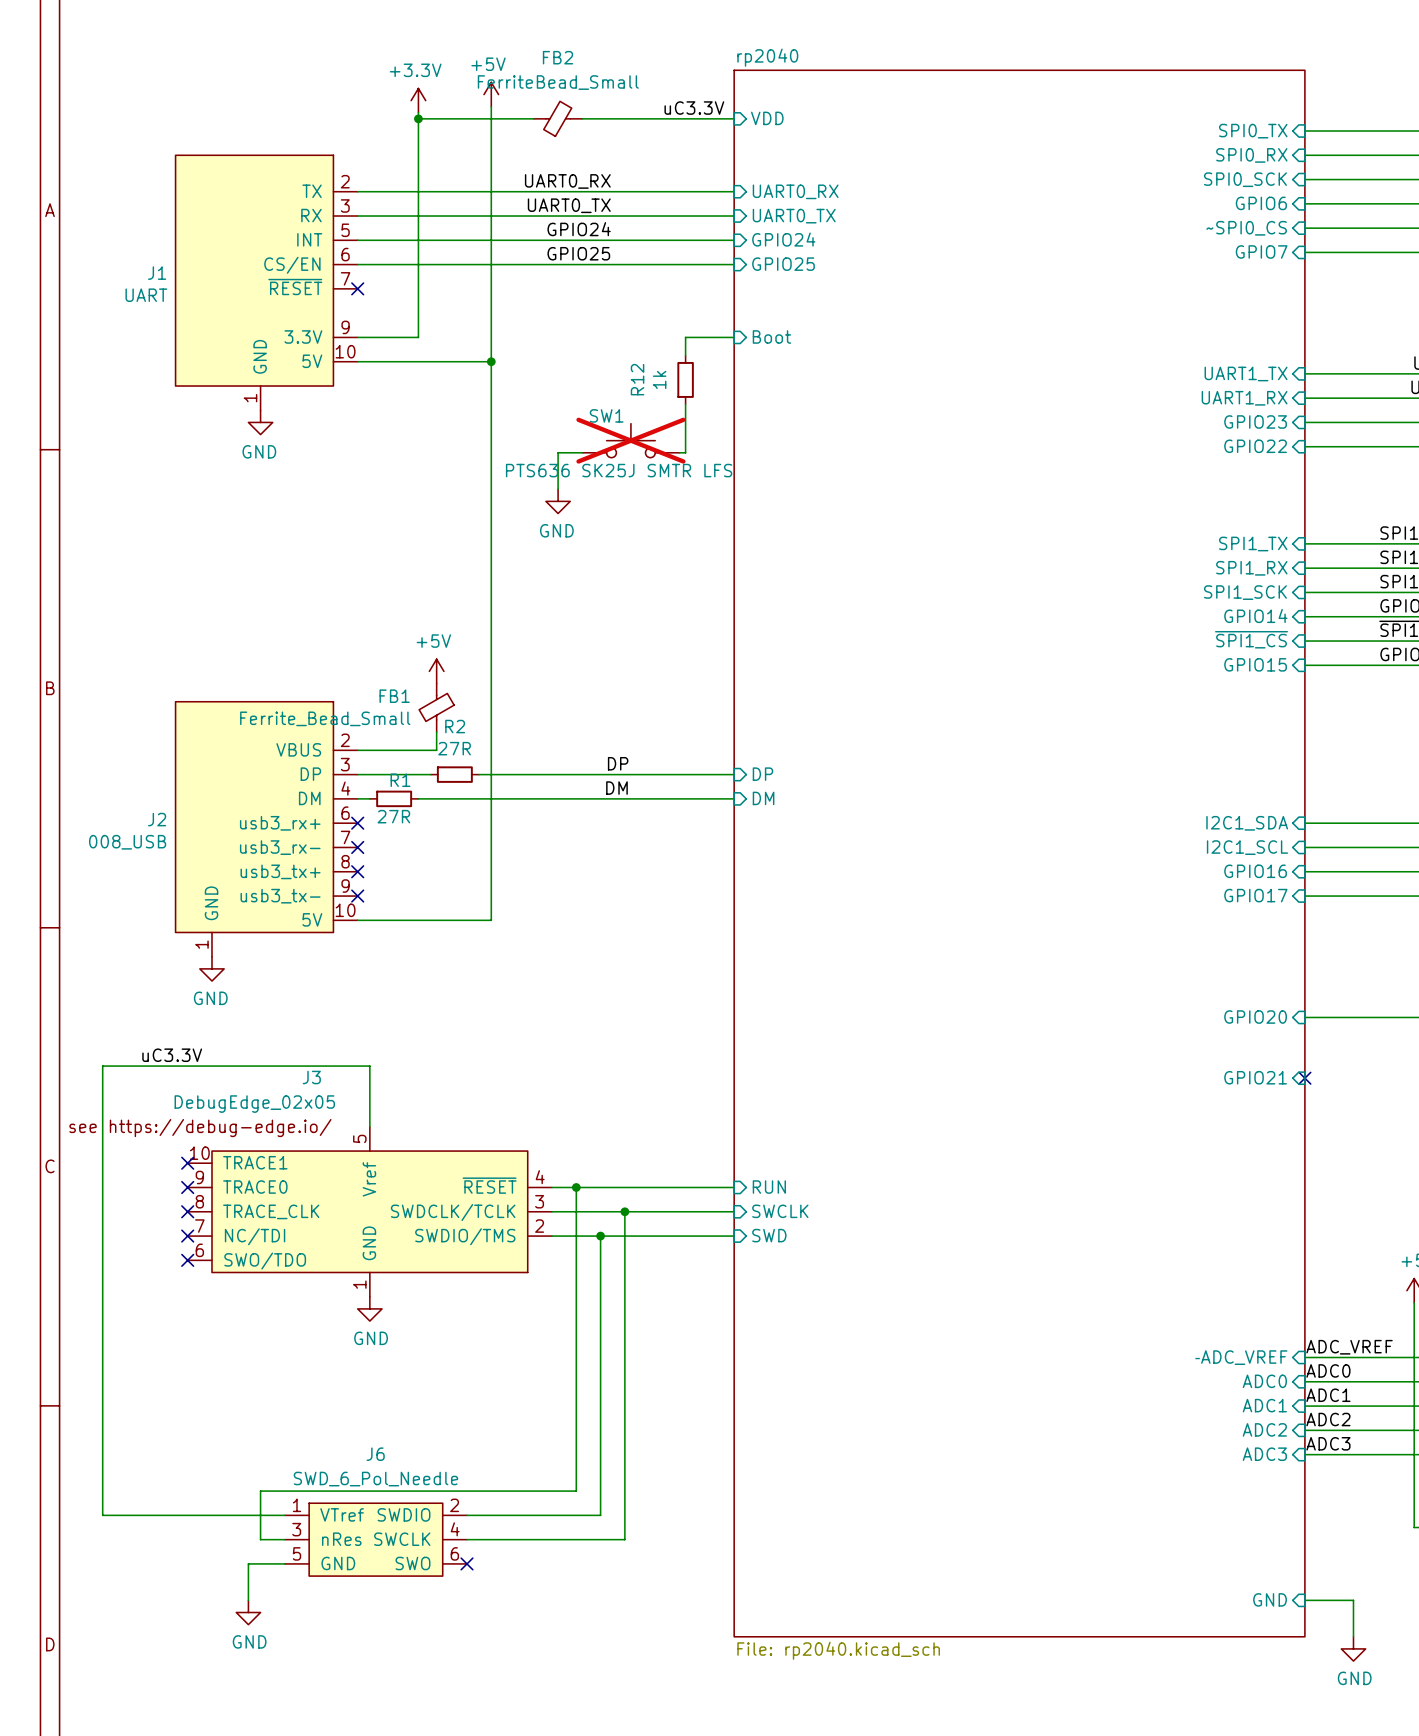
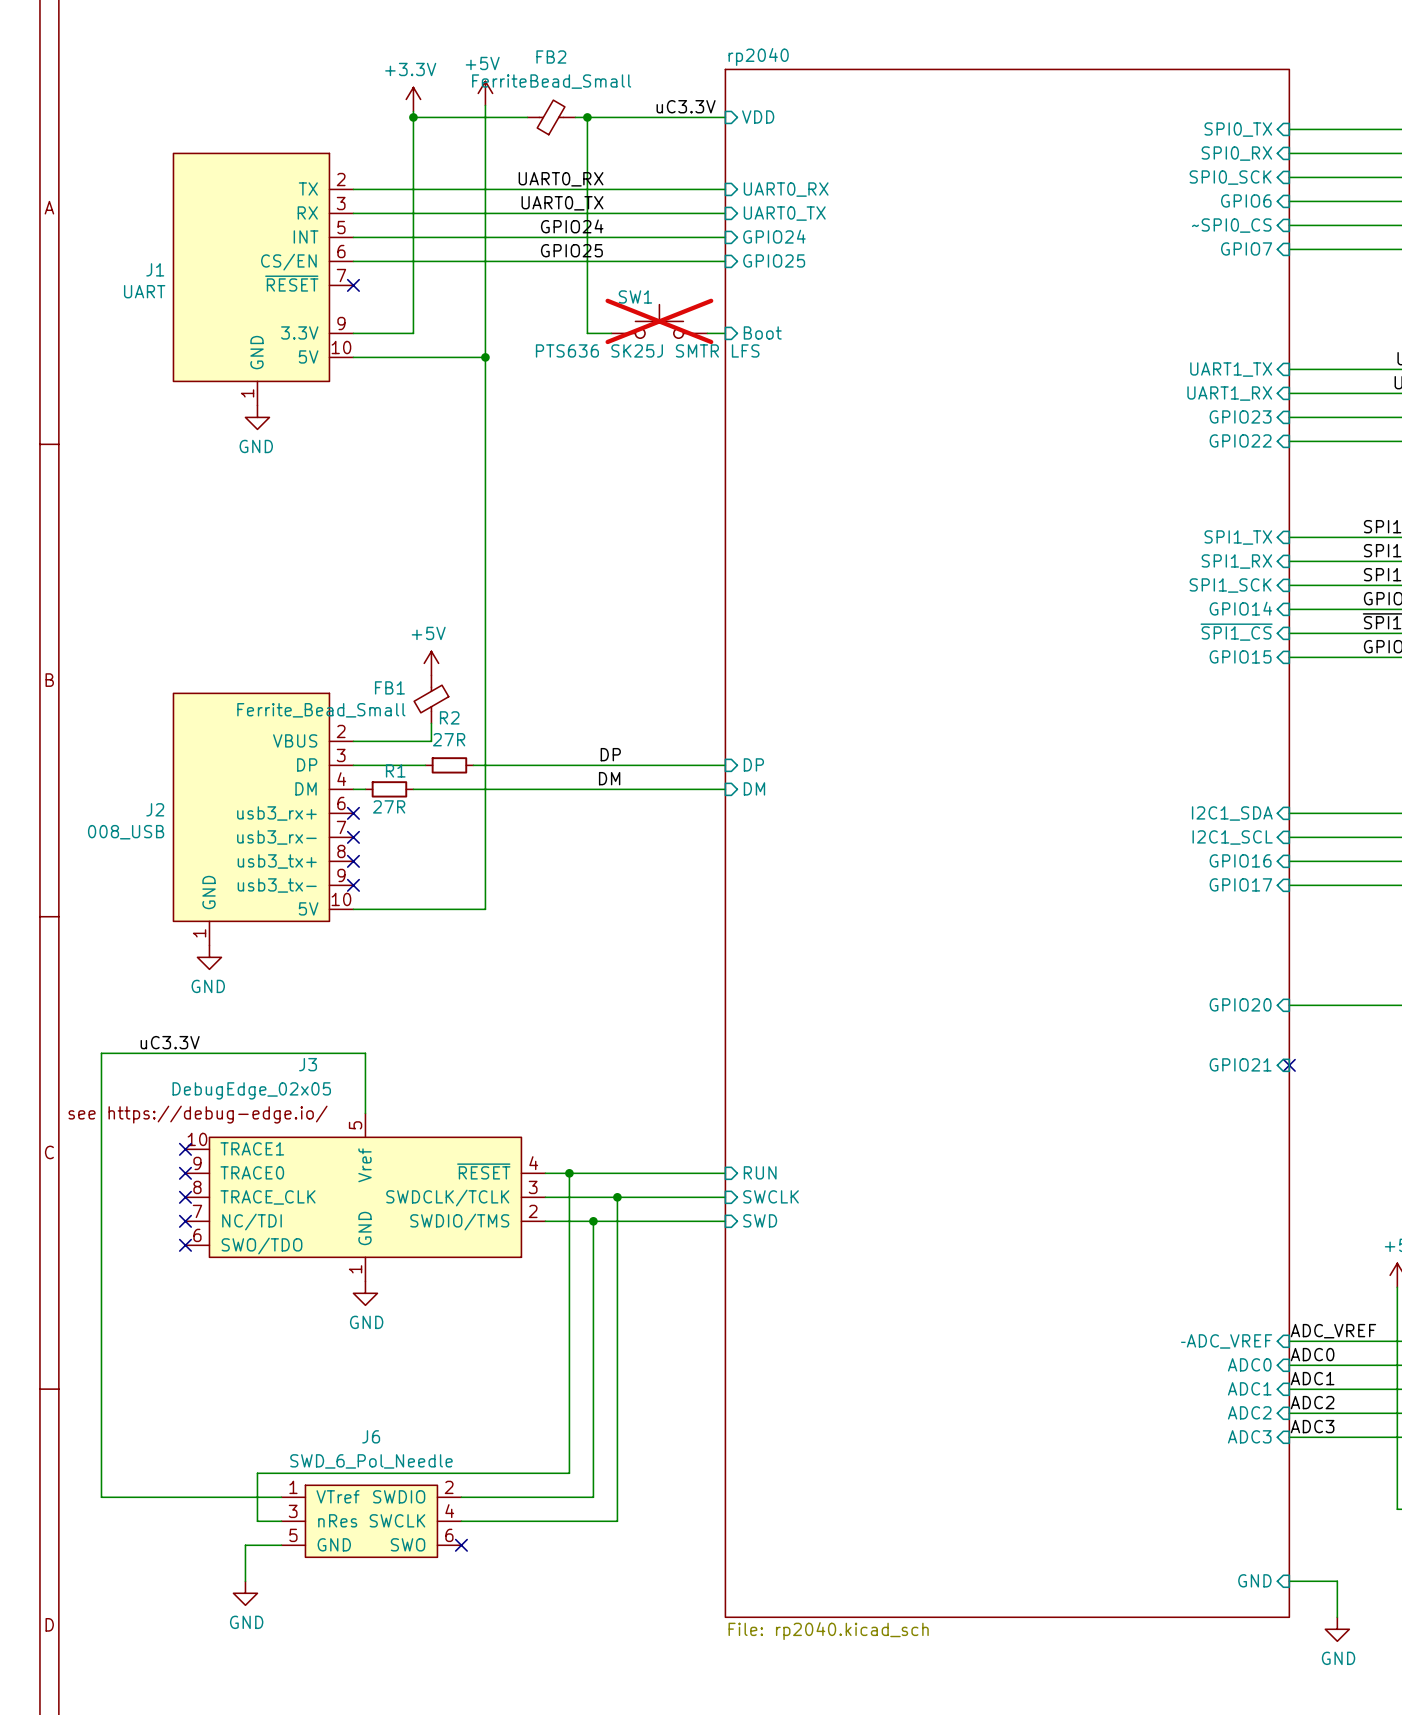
wire: none -> (587, 117) (587, 333) (611, 333)
junction: none -> (587, 117)
R12: 1k (685, 379) -> none
wire: (685, 404) (685, 452) (679, 452) -> none
SW1 position: (630, 440) -> (659, 321)
wire: (582, 452) (558, 452) (558, 489) -> none
power symbol: GND (558, 501) -> none

